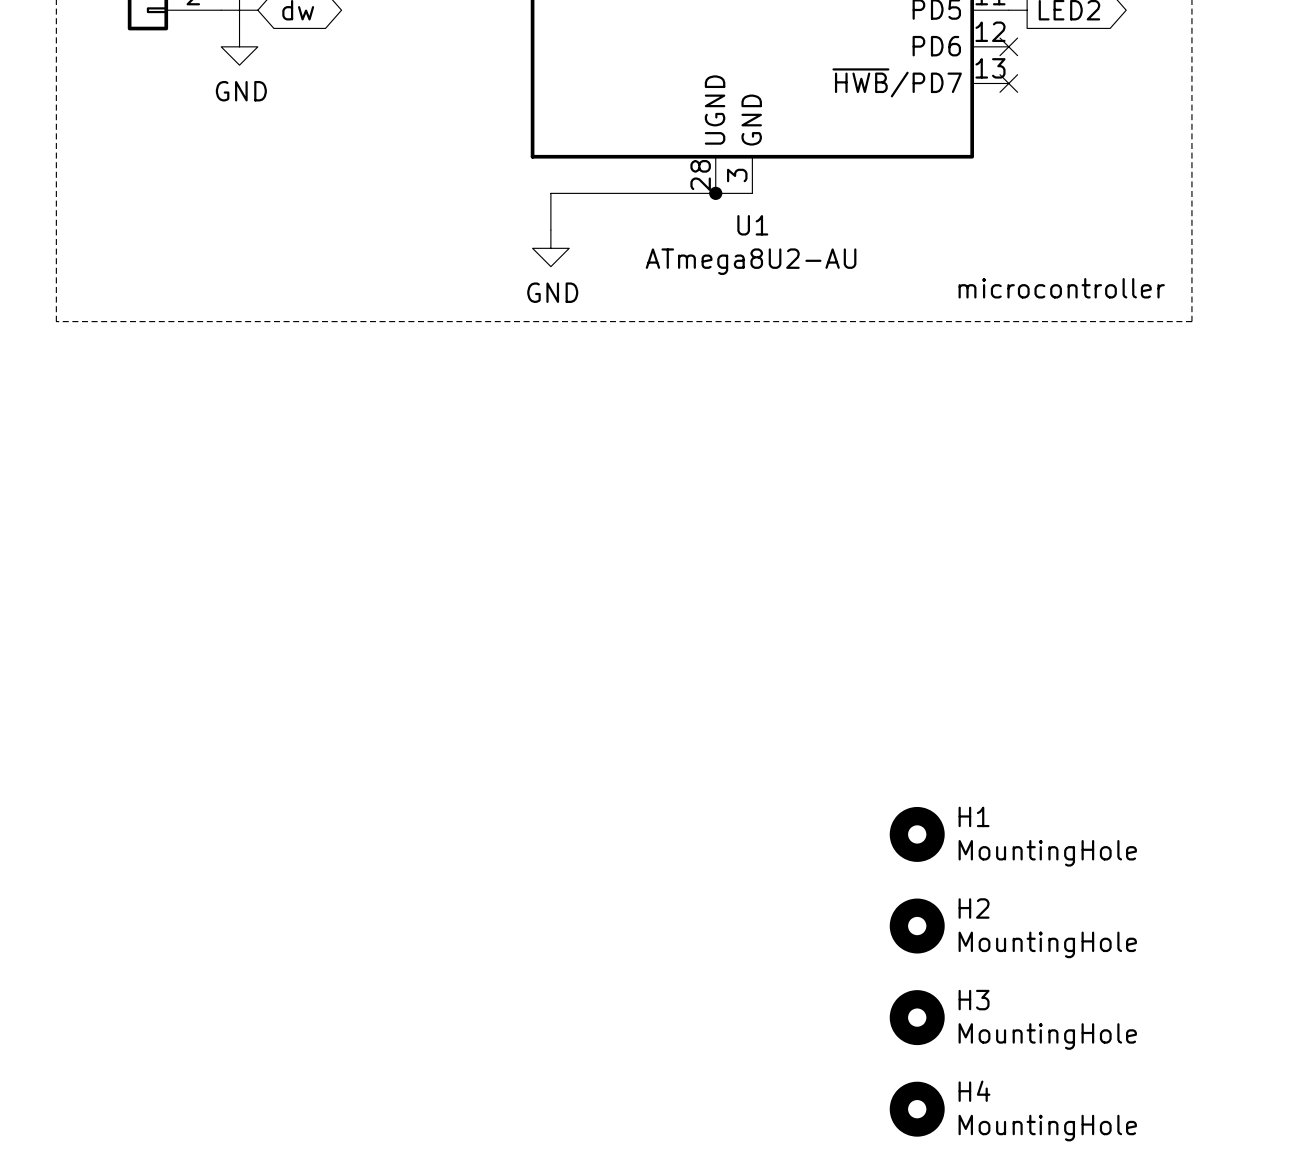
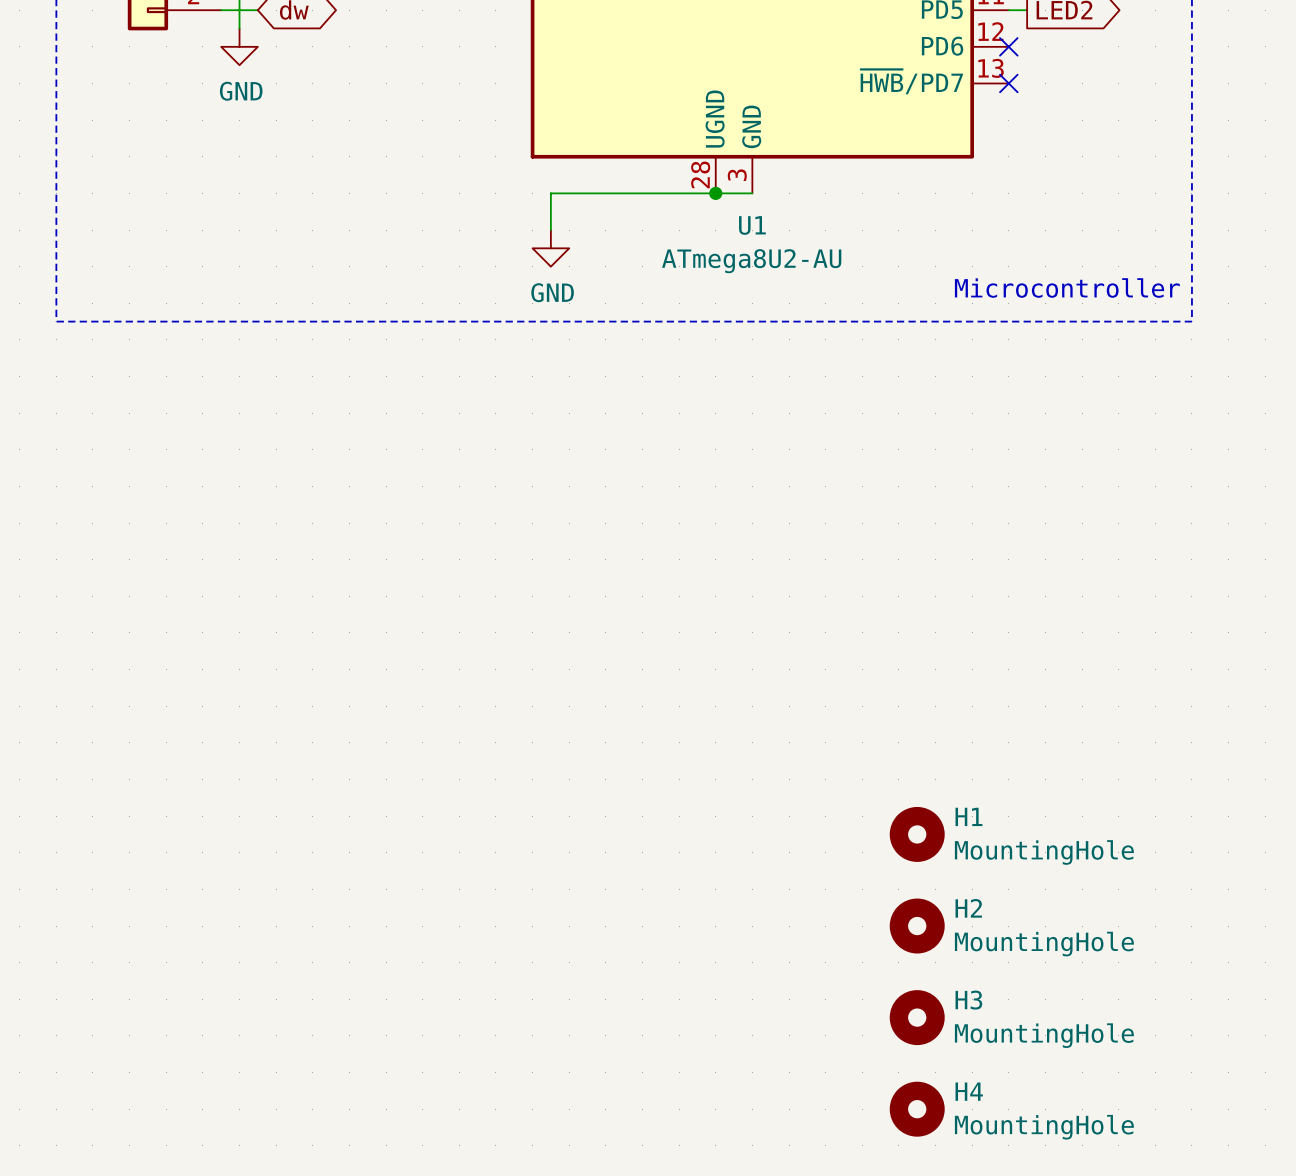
text: microcontroller (1061, 288) -> Microcontroller (1067, 287)

